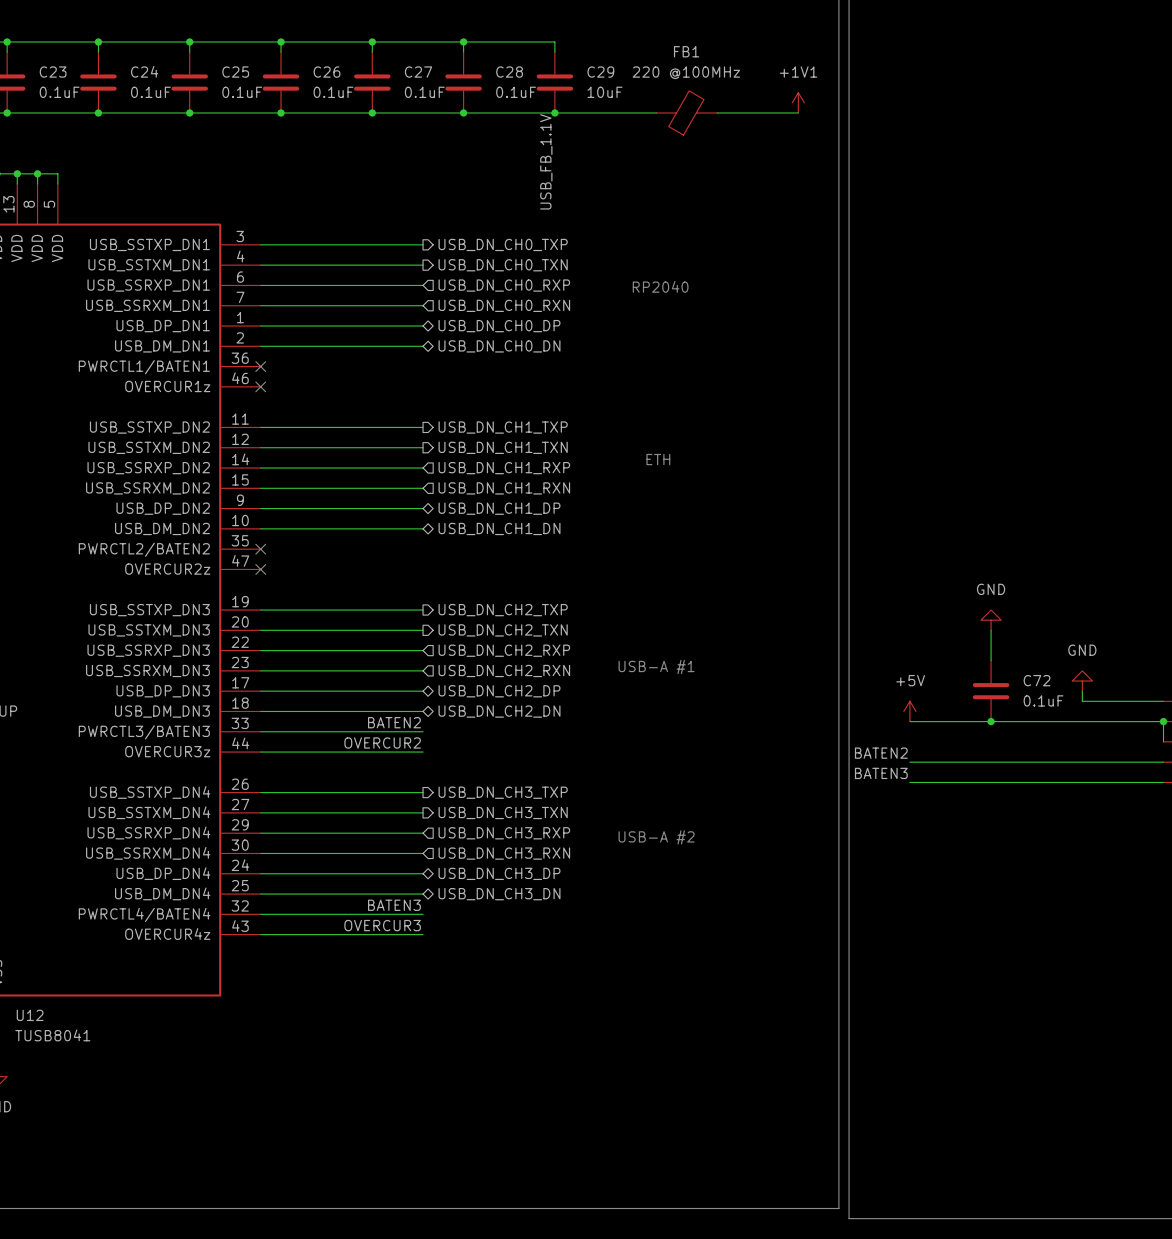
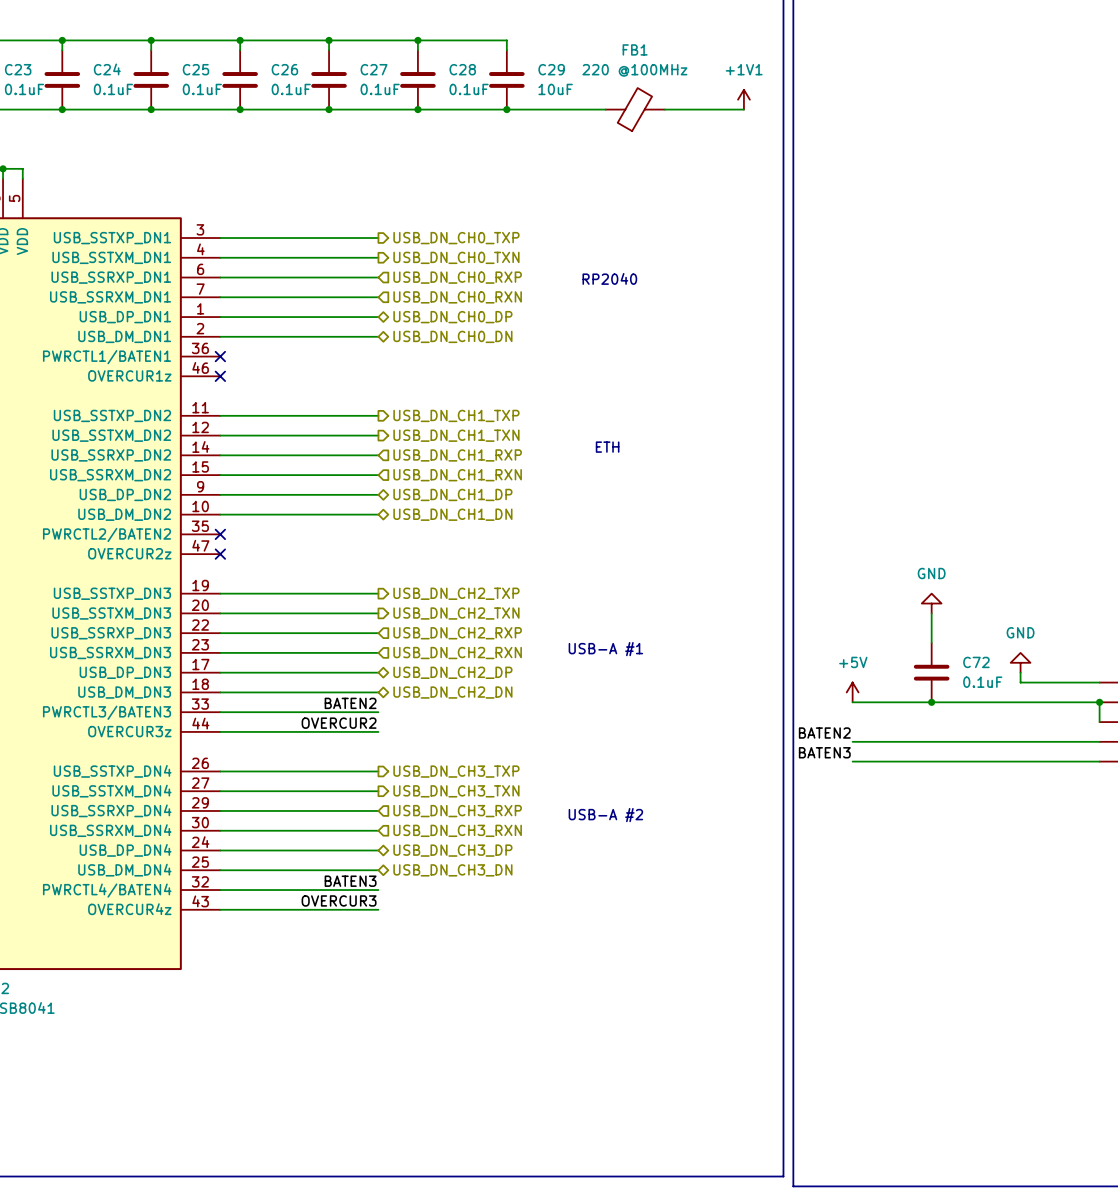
label: USB_FB_1.1V (546, 161) -> none

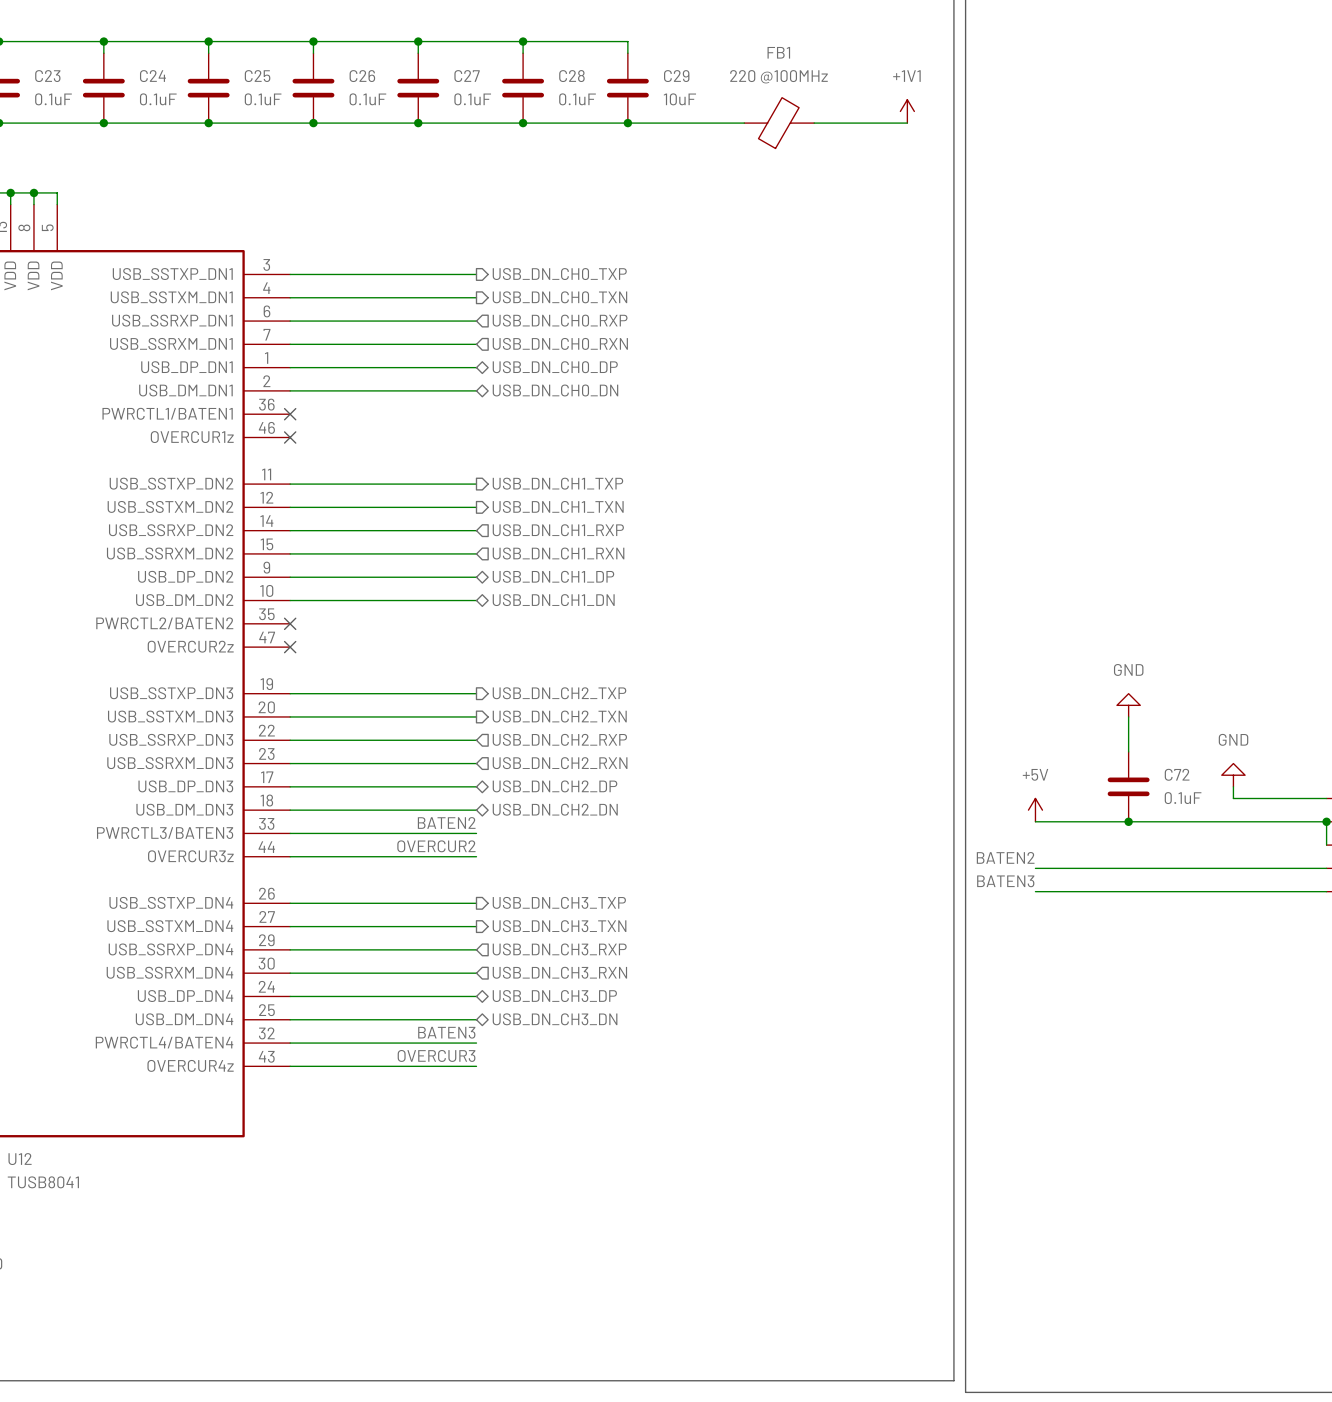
text: RP2040 (609, 278) -> none
text: ETH (607, 447) -> none
text: USB-A #1 (605, 649) -> none
text: USB-A #2 (605, 815) -> none

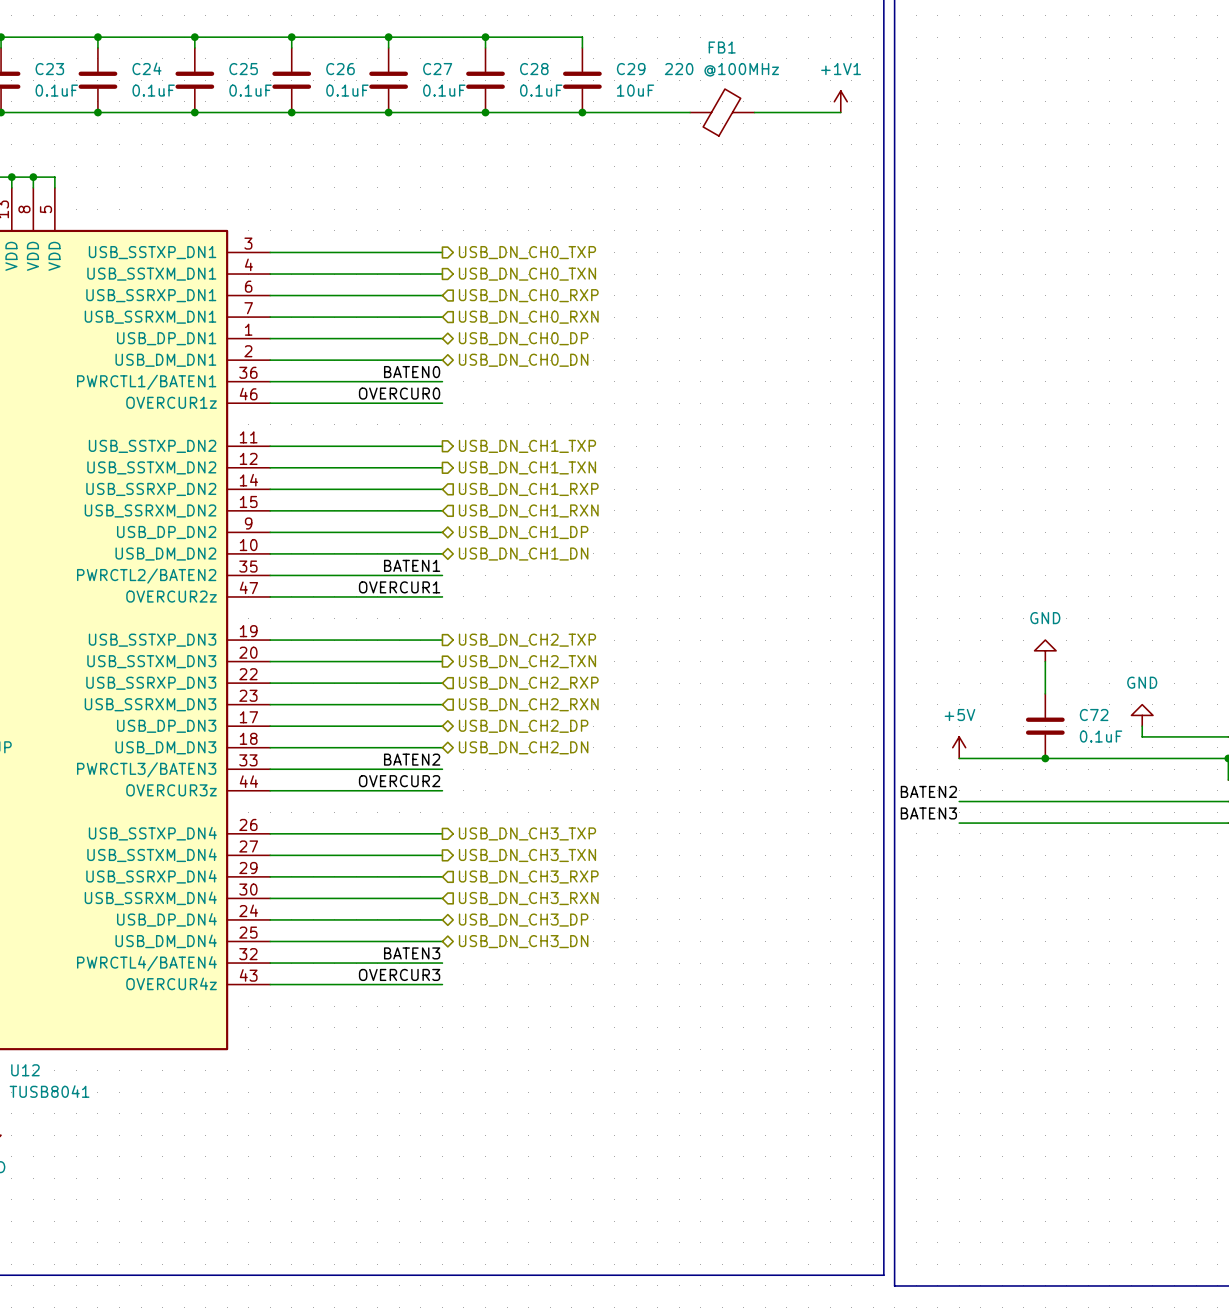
label: none -> BATEN0 (412, 372)
wire: none -> (270, 381) (442, 381)
no-connect mark: (290, 414) -> none
label: none -> OVERCUR0 (399, 393)
wire: none -> (270, 403) (442, 403)
no-connect mark: (290, 437) -> none
label: none -> BATEN1 (412, 565)
wire: none -> (270, 575) (442, 575)
no-connect mark: (290, 623) -> none
label: none -> OVERCUR1 (399, 587)
wire: none -> (270, 596) (442, 596)
no-connect mark: (290, 647) -> none

